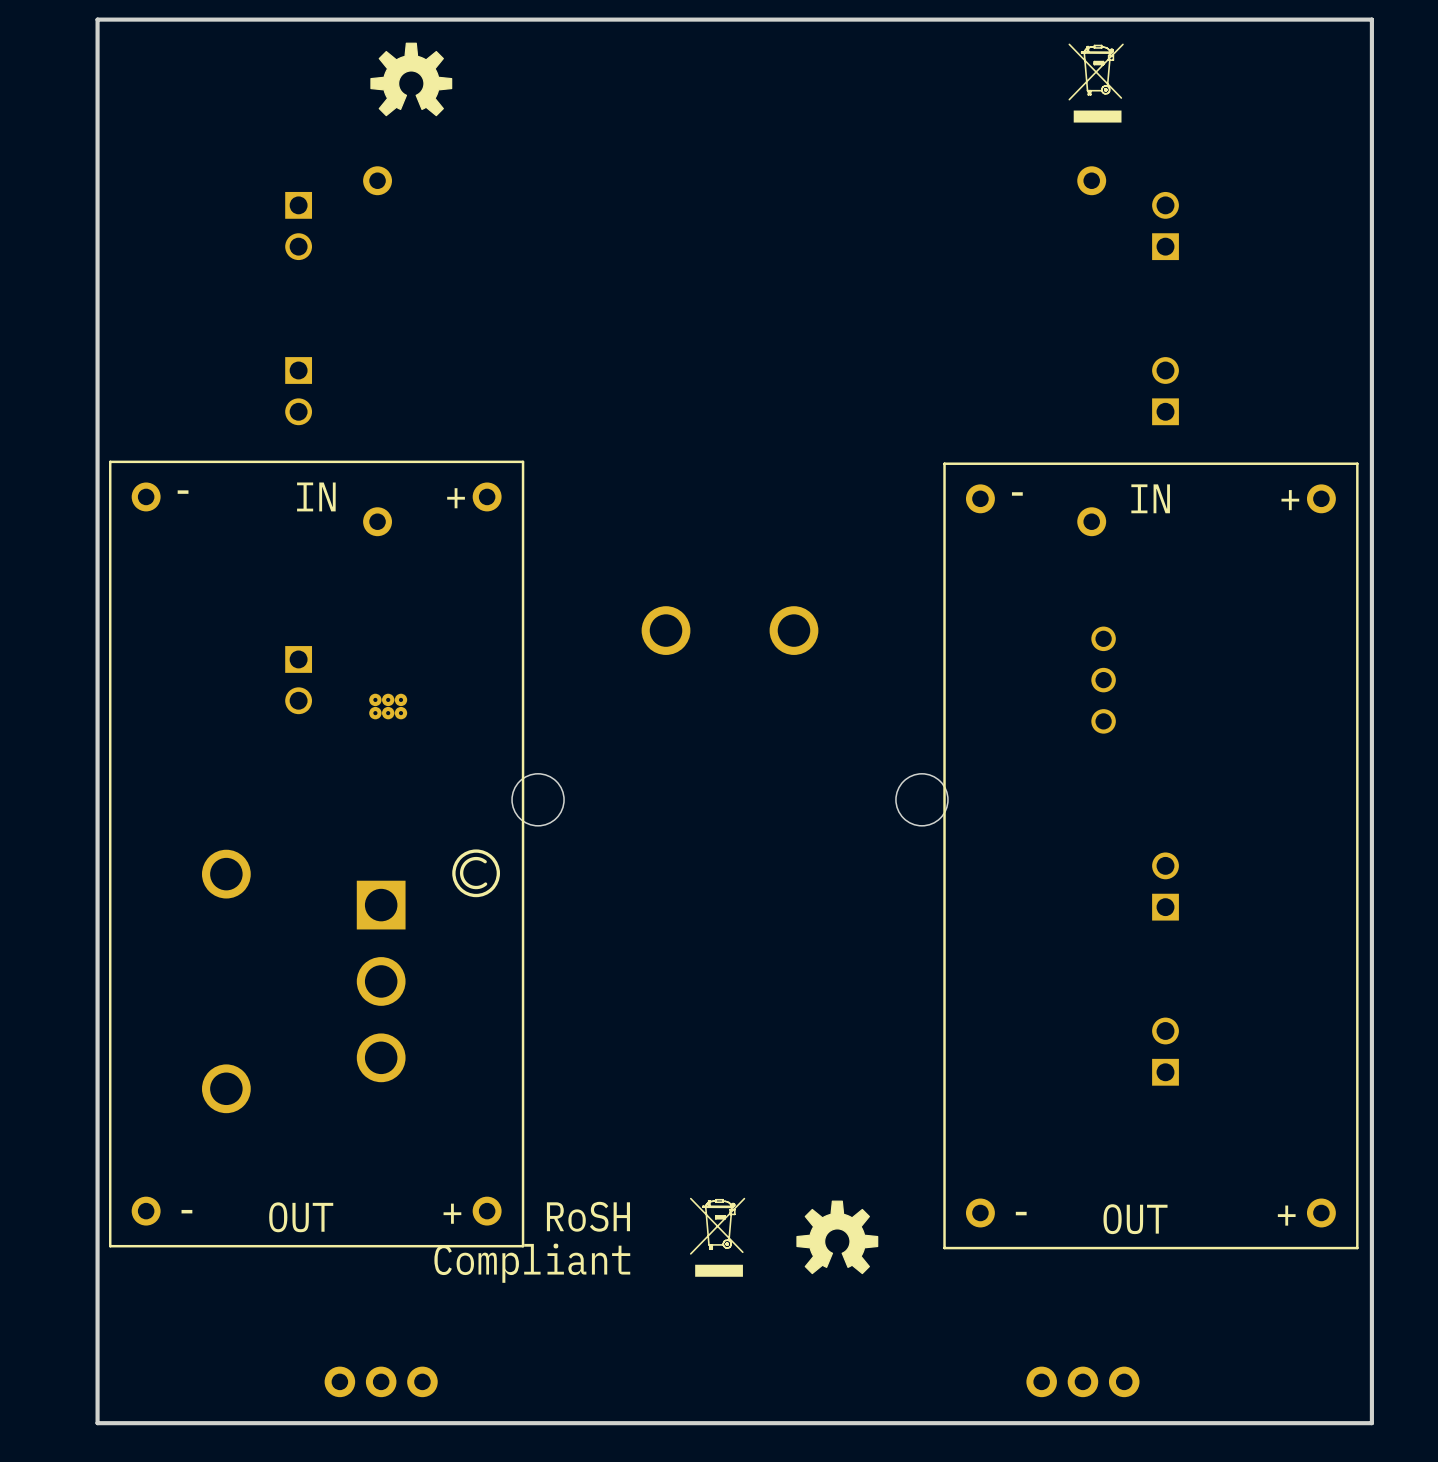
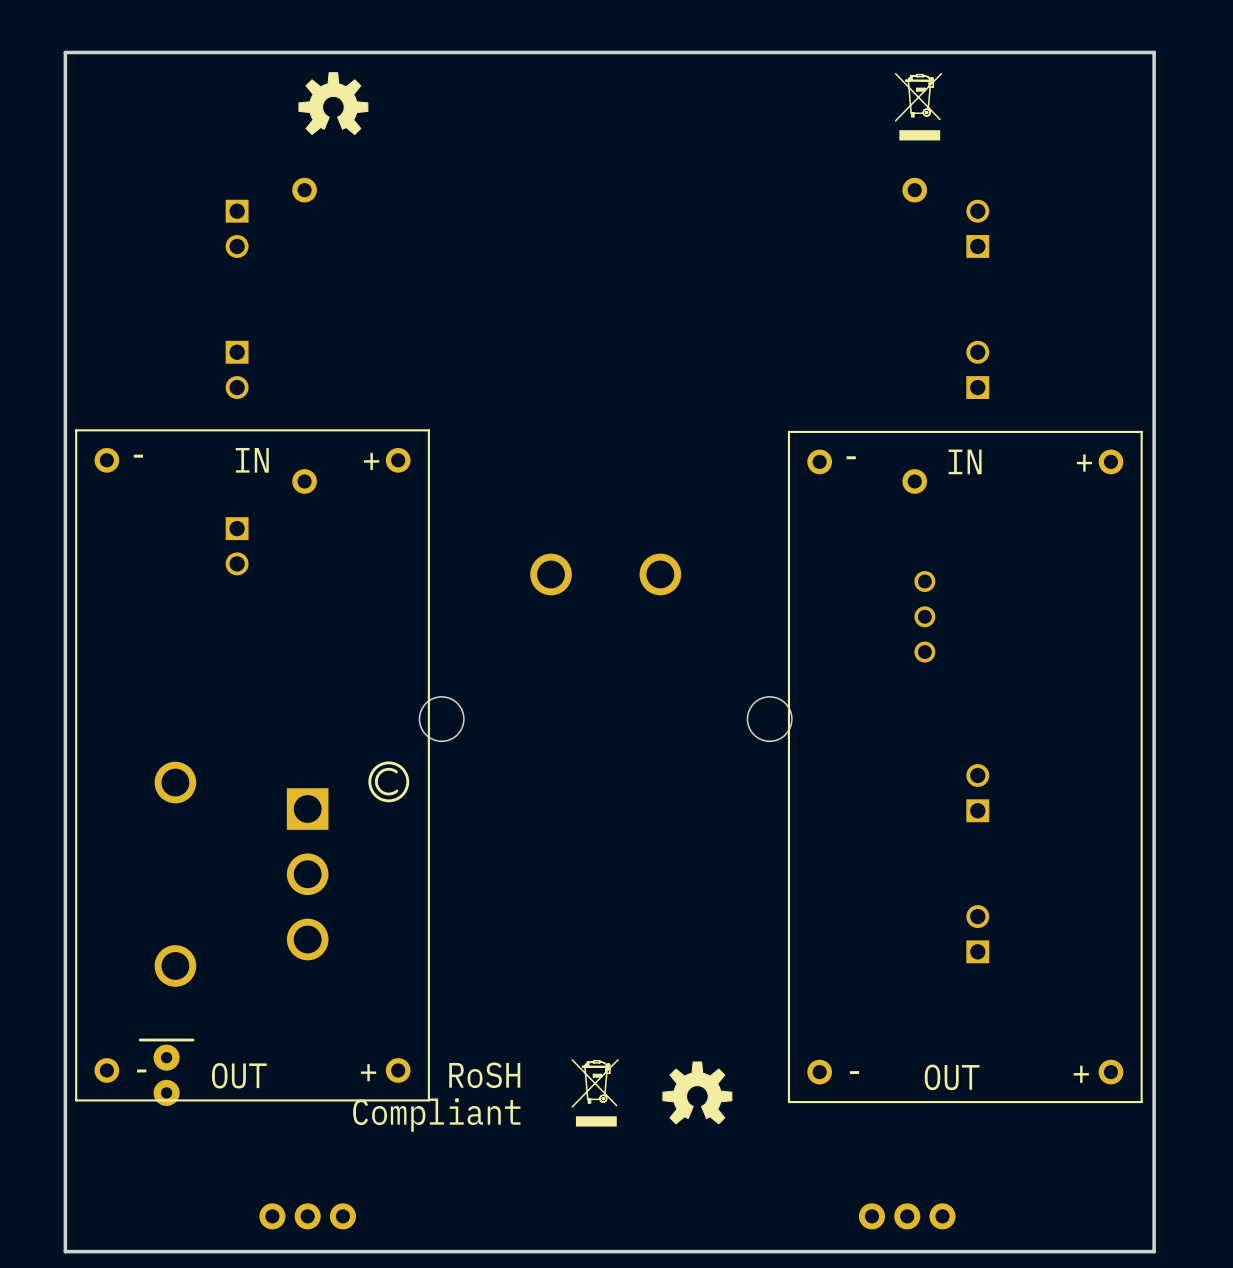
part position: (298, 680) -> (237, 546)
part: (388, 706) -> none
part: none -> (166, 1072)

